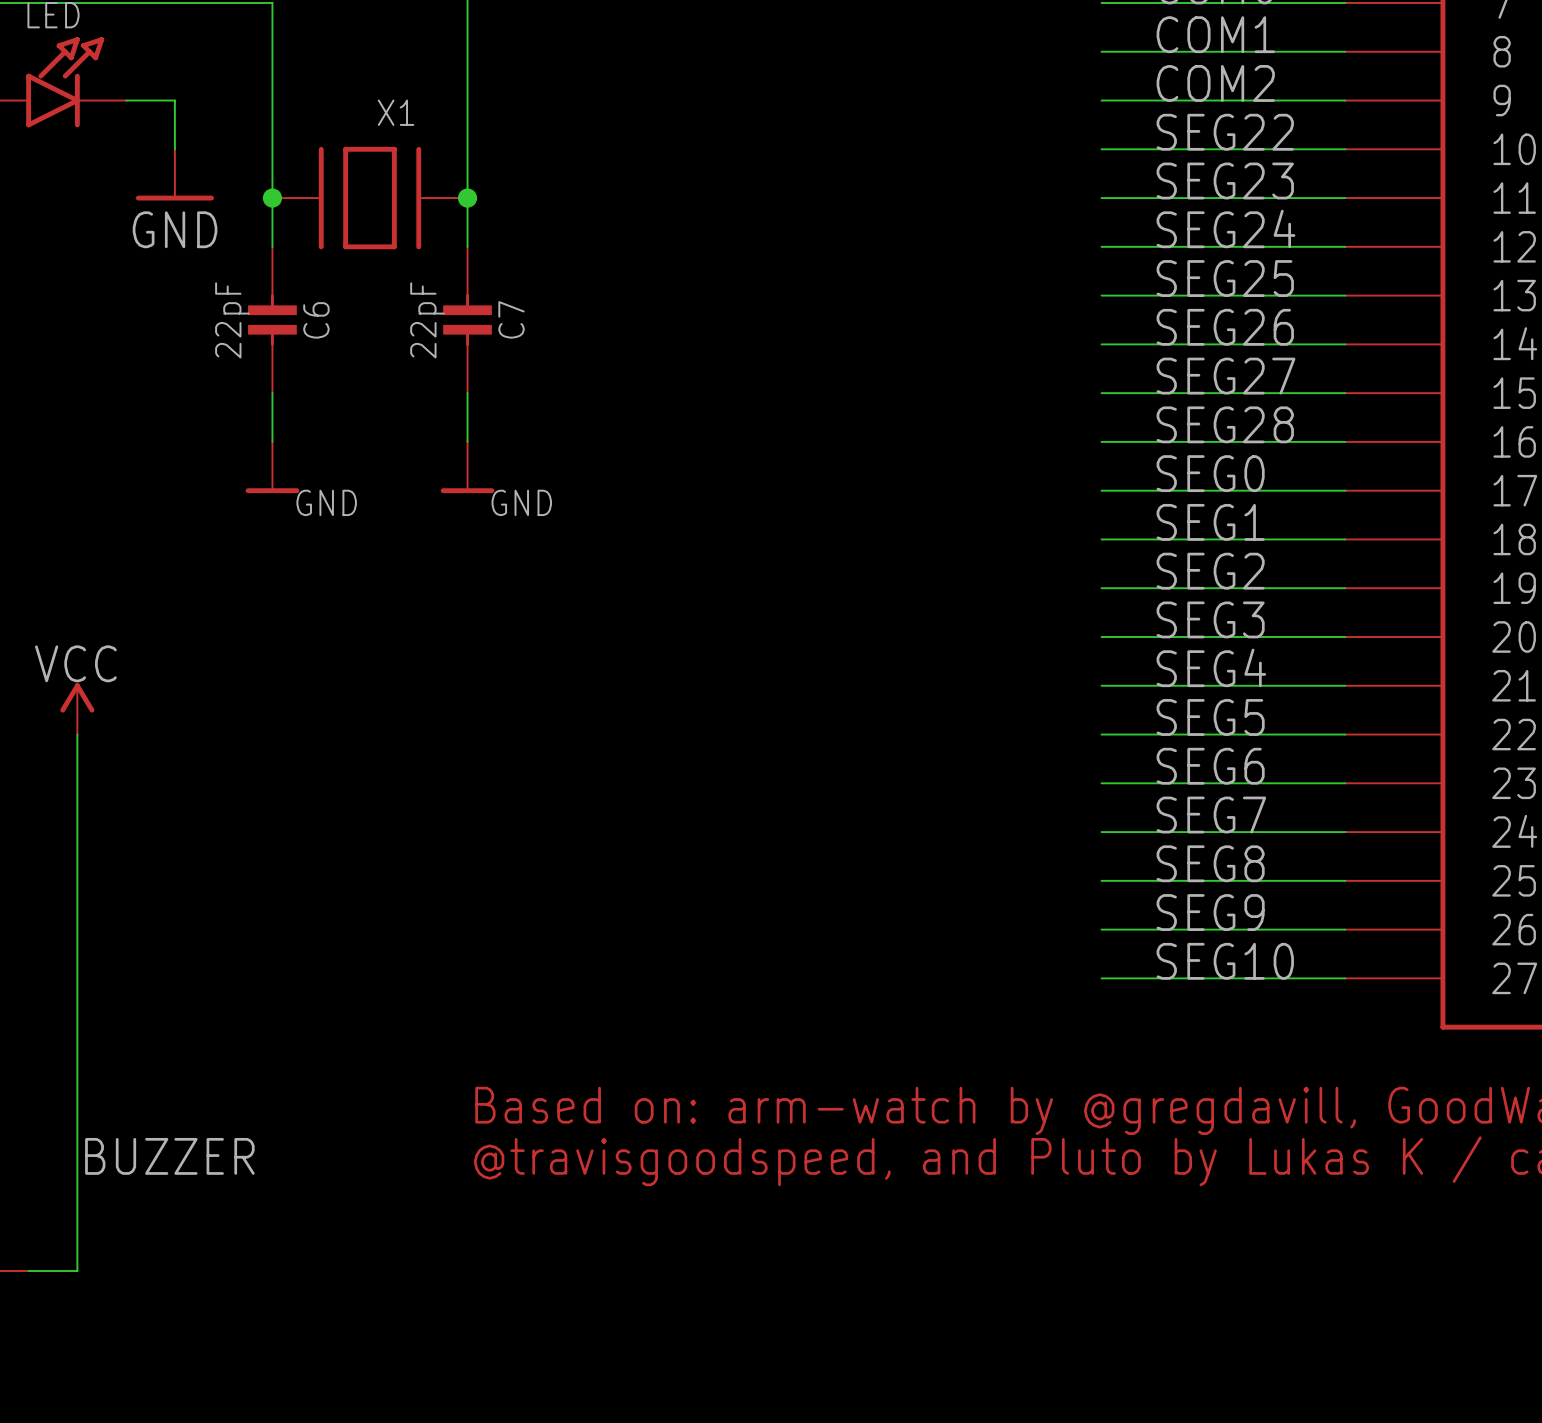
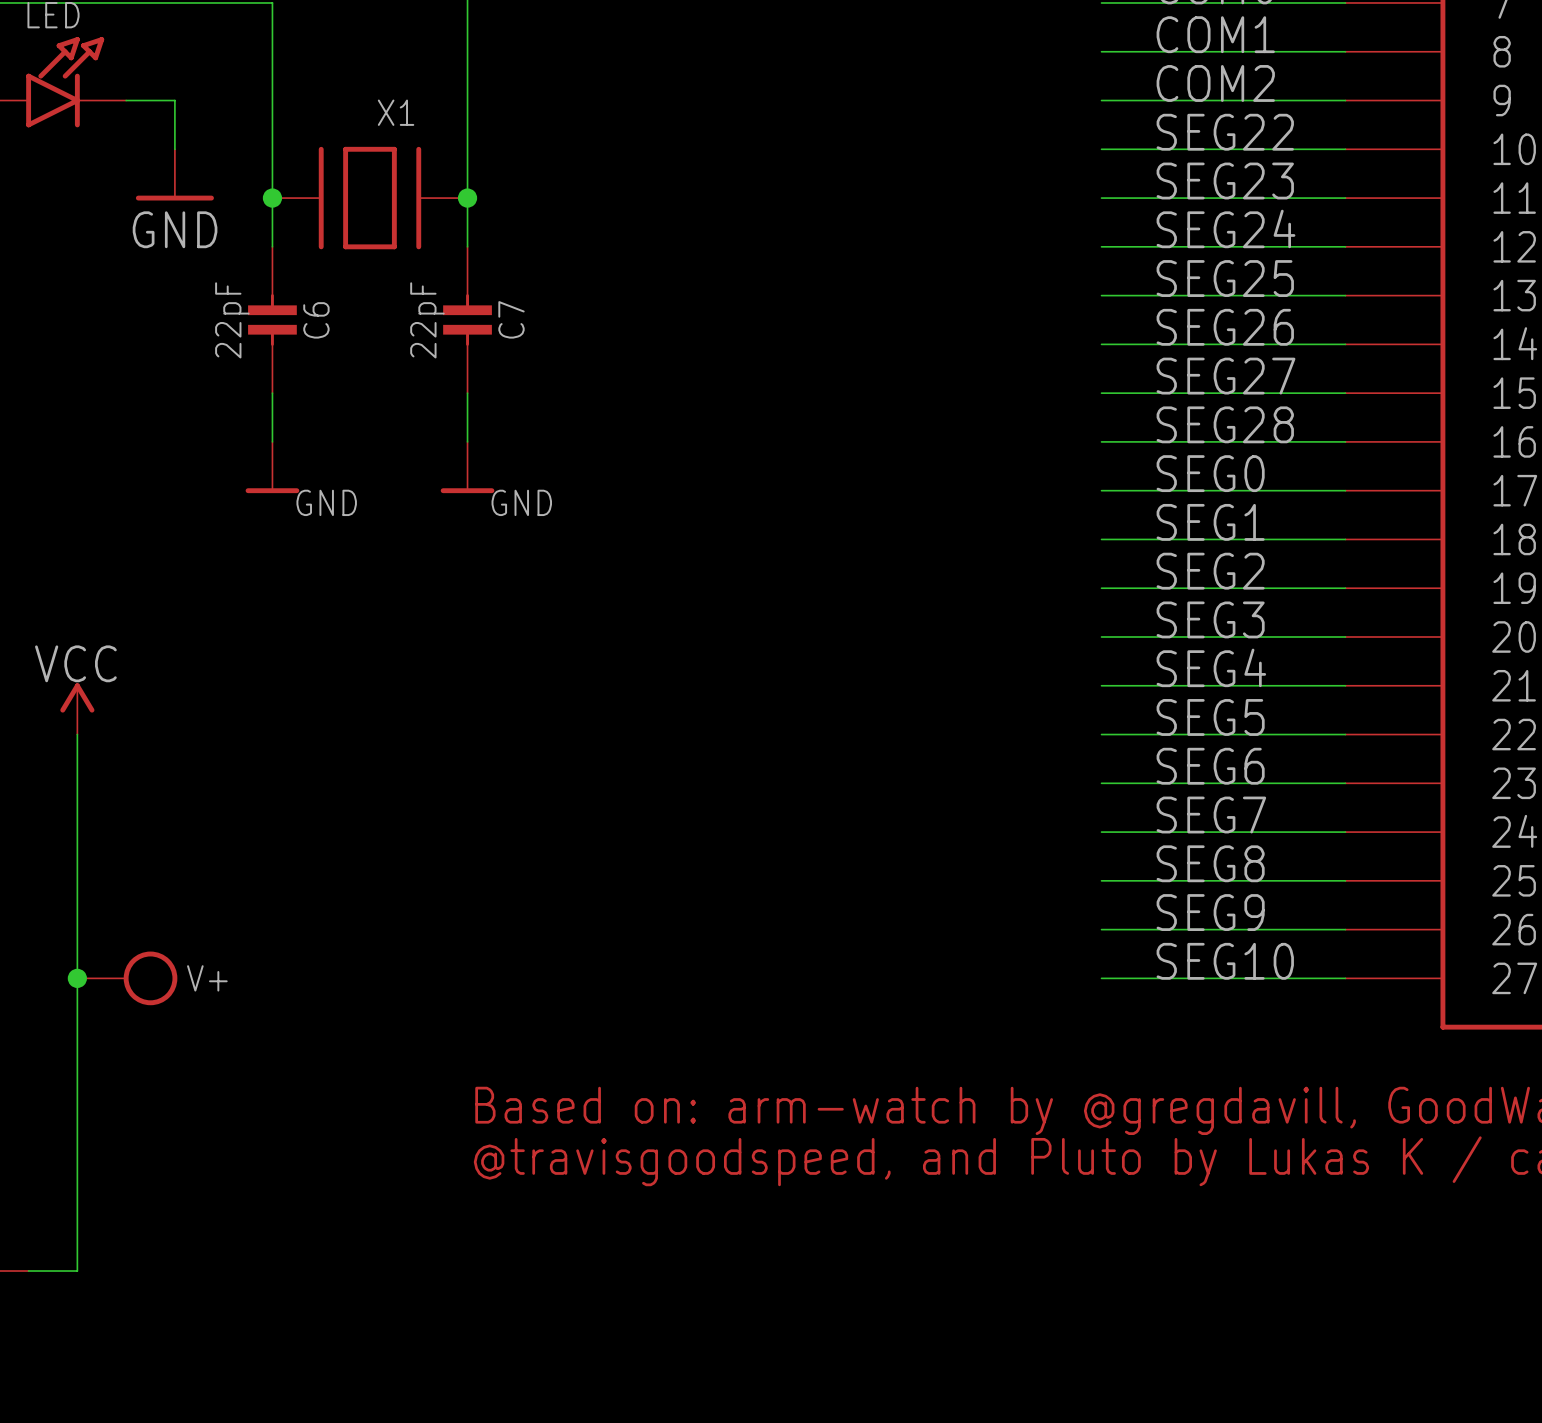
junction: none -> (77, 978)
V+: none -> (127, 978)
label: BUZZER (169, 1156) -> none

